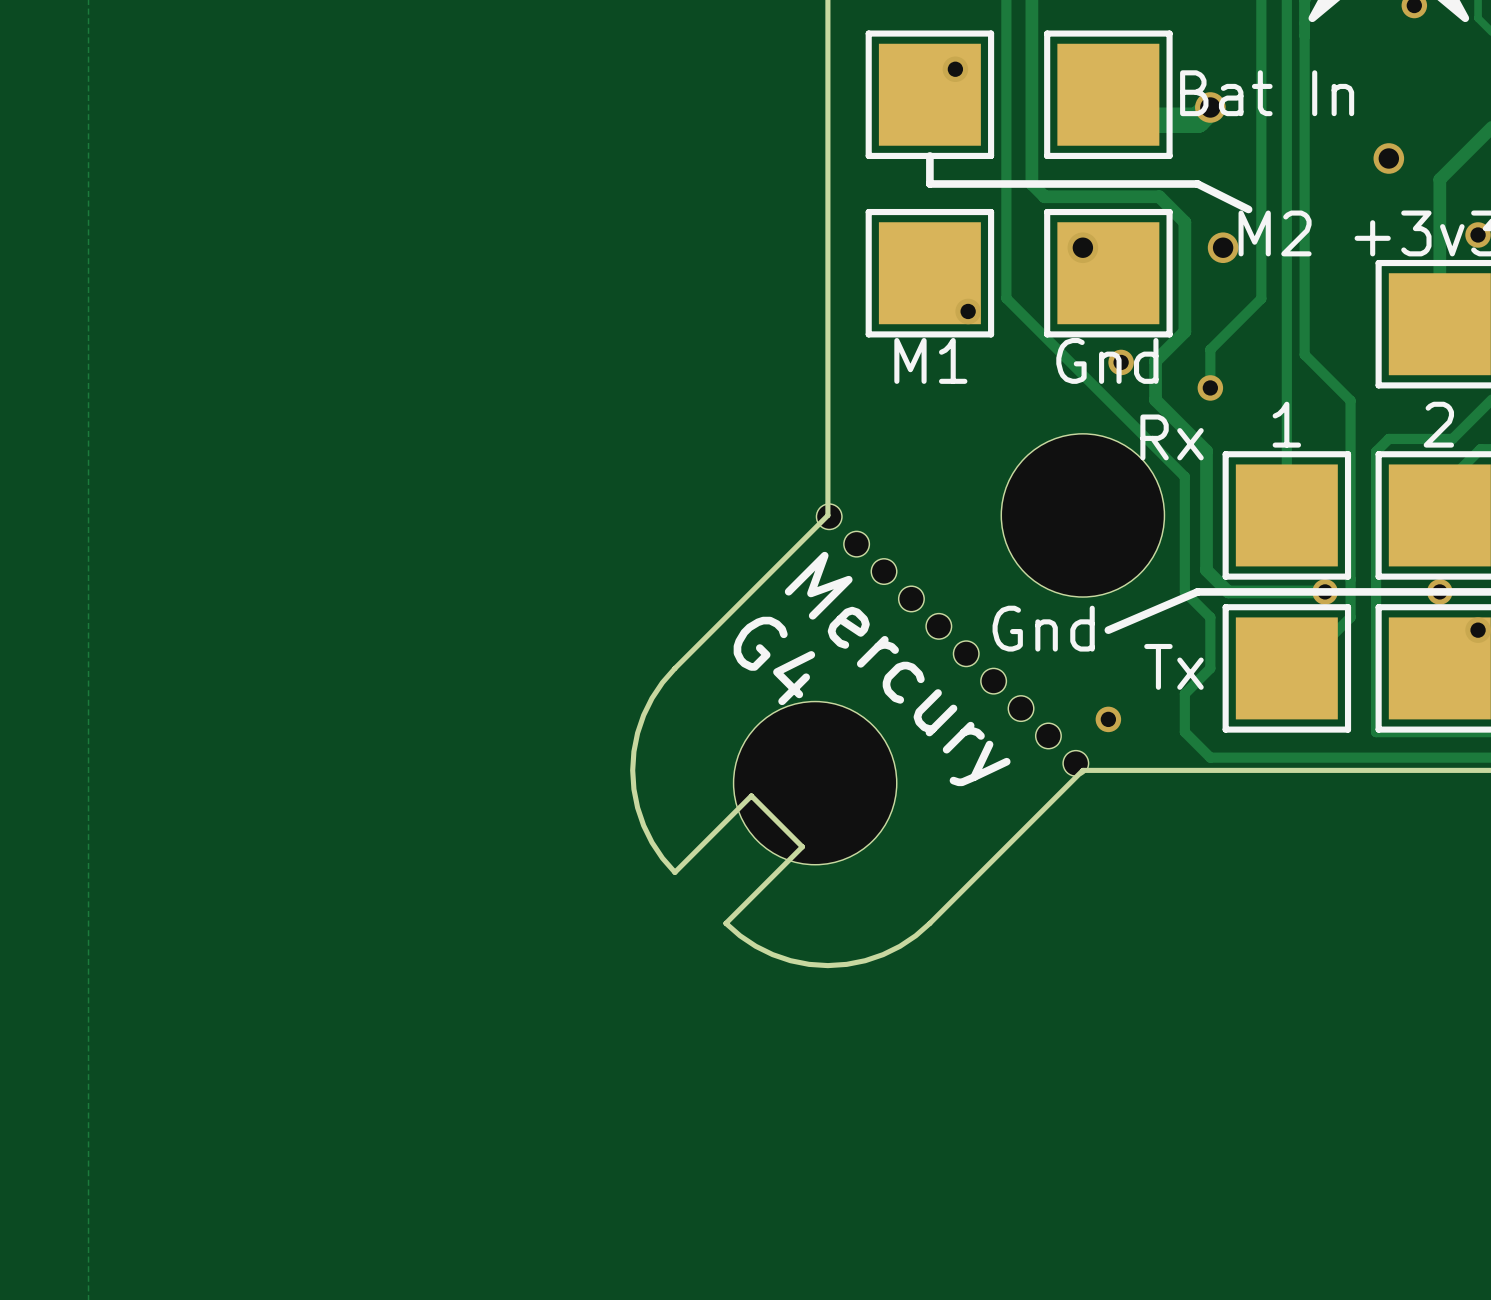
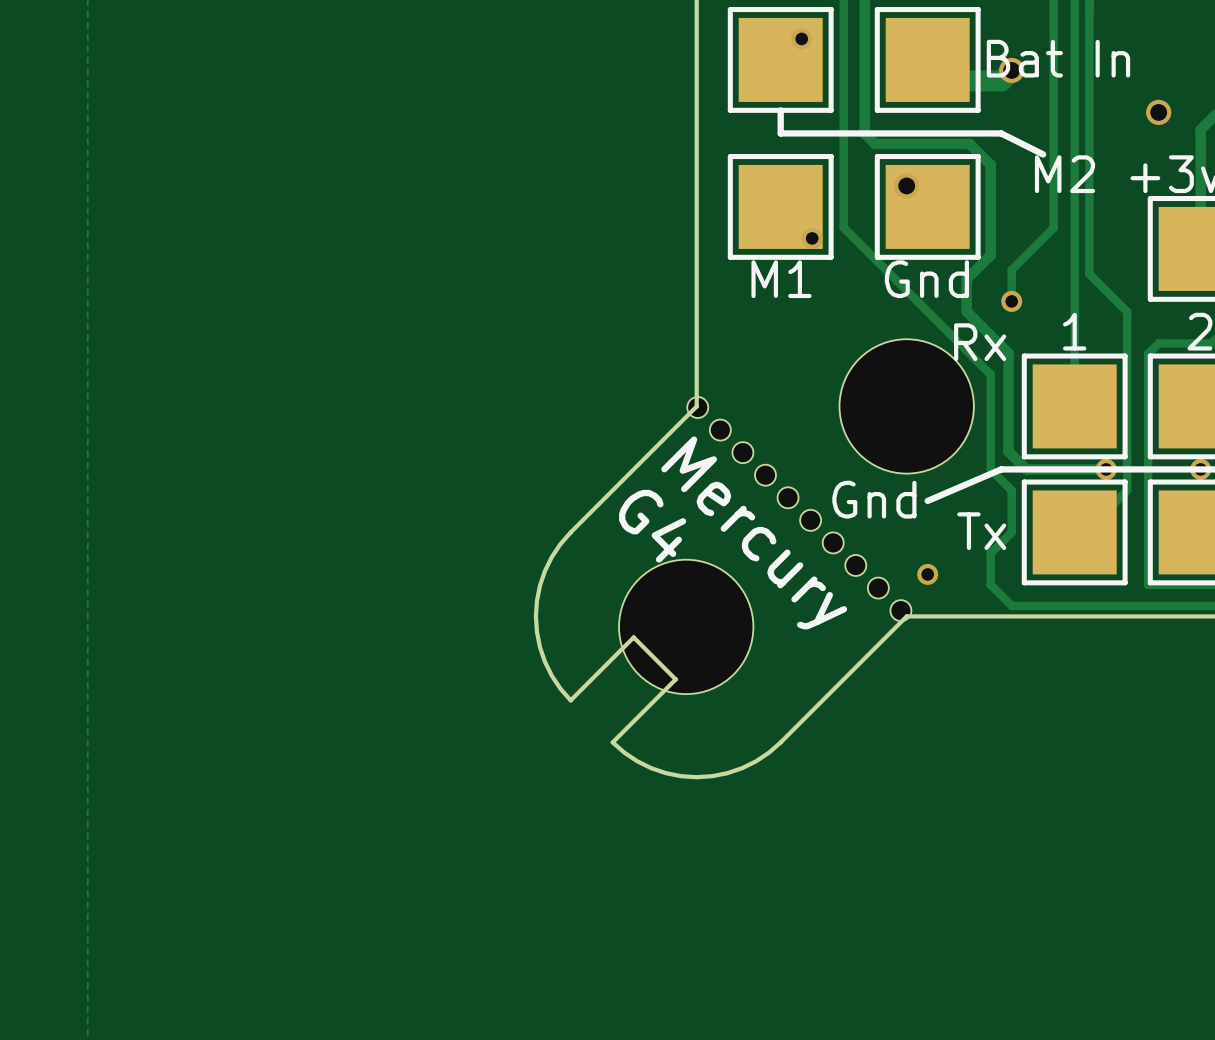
via: (1223, 247) -> none
via: (1121, 362) -> none

